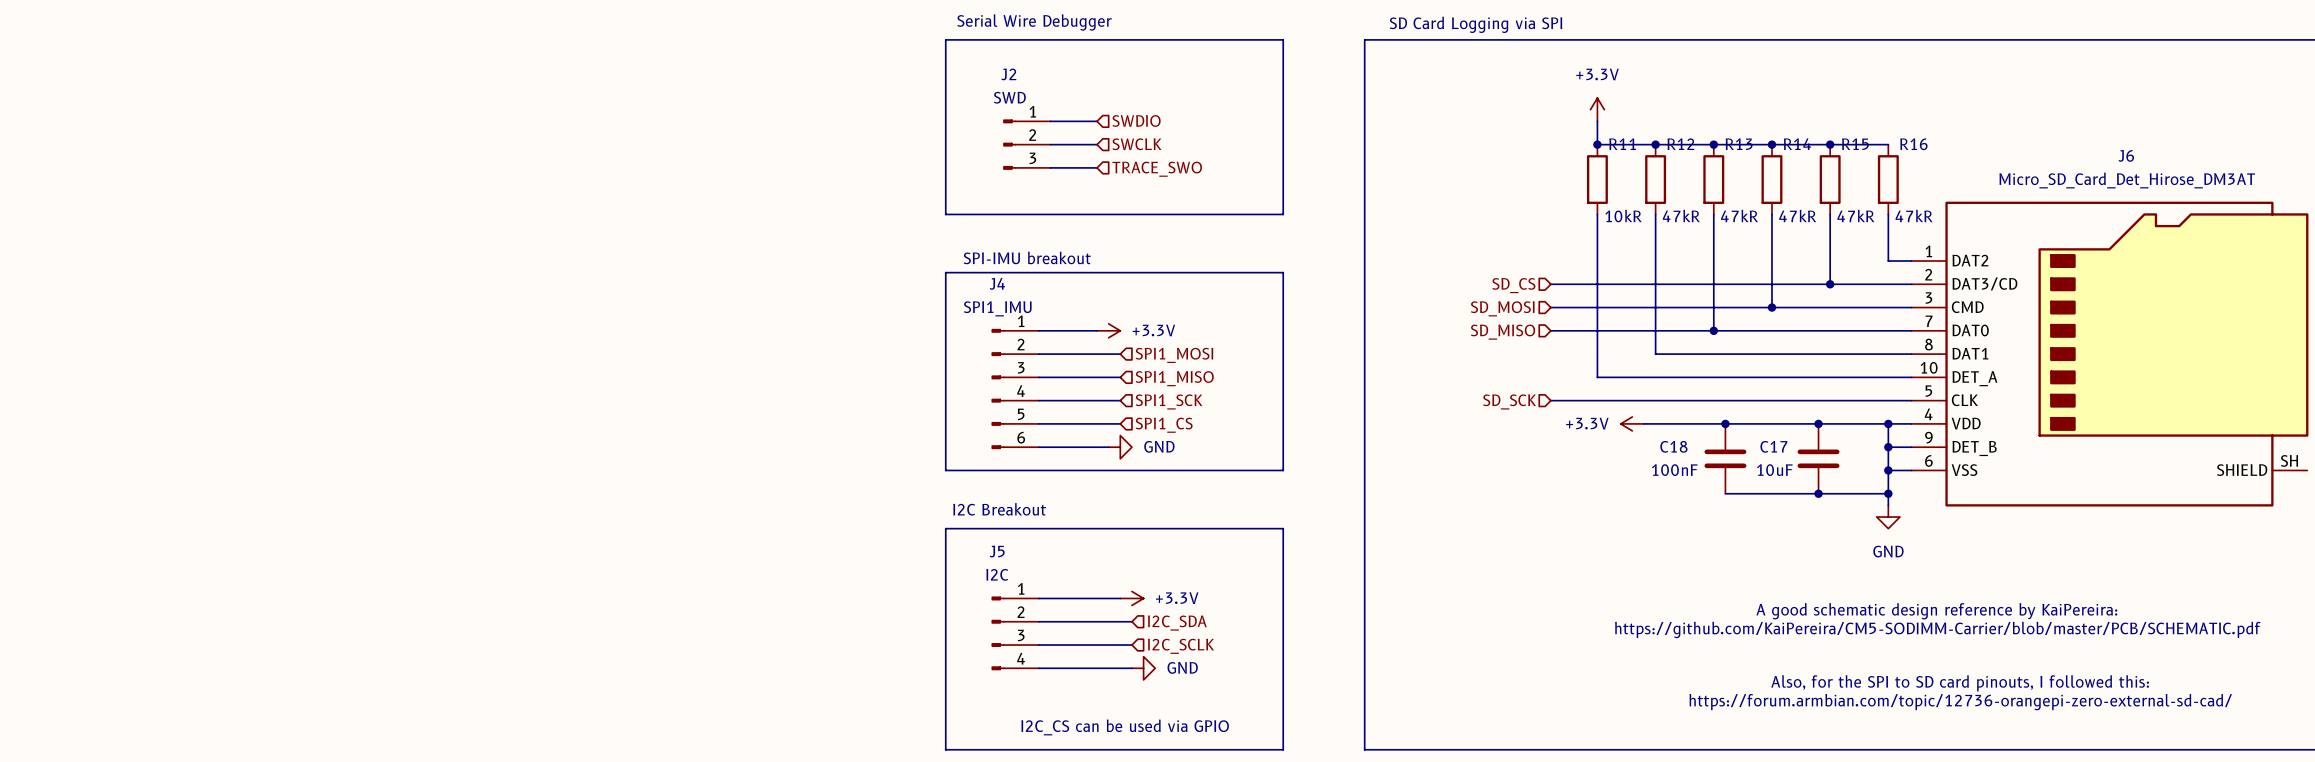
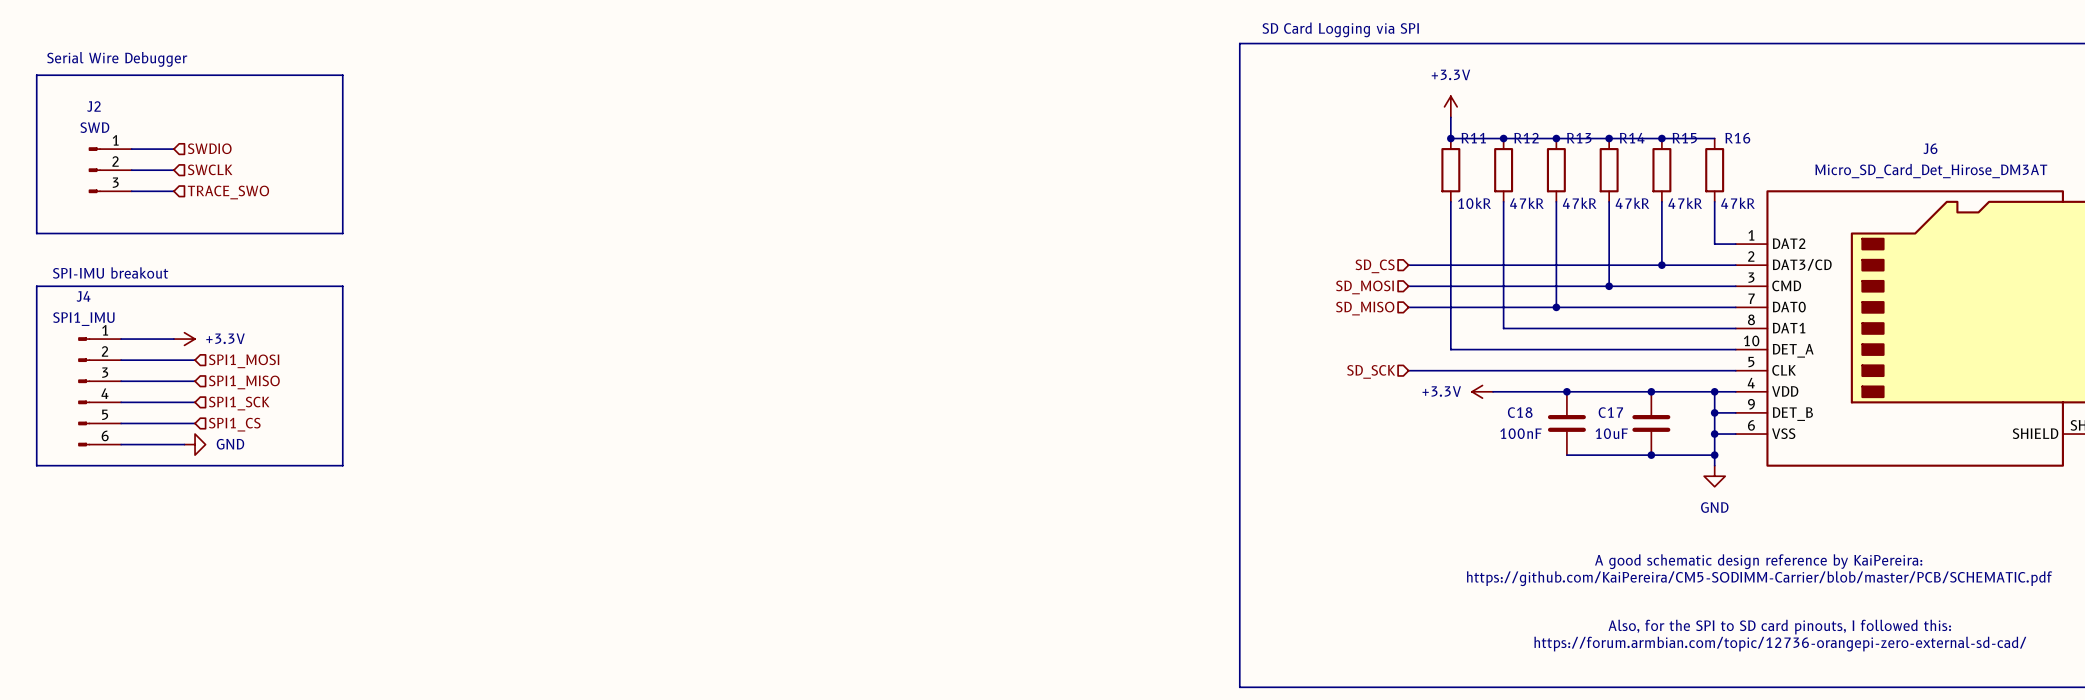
text: Serial Wire Debugger (1034, 22) -> none
line: (945, 39) (945, 214) (1283, 214) (1283, 39) (945, 39) -> none
text: none -> Serial Wire Debugger (117, 59)
line: none -> (36, 75) (36, 233) (342, 233) (342, 75) (36, 75)
hierarchical label: SWDIO (1136, 120) -> none
wire: (1050, 121) (1097, 121) -> none
J2 position: (1026, 144) -> (110, 170)
wire: (1050, 144) (1097, 144) -> none
hierarchical label: SWCLK (1136, 144) -> none
hierarchical label: none -> SWDIO (209, 148)
wire: none -> (131, 149) (173, 149)
wire: (1050, 167) (1097, 167) -> none
hierarchical label: TRACE_SWO (1157, 169) -> none
wire: none -> (131, 170) (173, 170)
hierarchical label: none -> SWCLK (210, 169)
wire: none -> (131, 191) (173, 191)
hierarchical label: none -> TRACE_SWO (228, 192)
text: SPI-IMU breakout (1027, 257) -> none
line: (945, 272) (1283, 272) (1283, 470) (945, 470) (945, 272) -> none
text: none -> SPI-IMU breakout (110, 272)
line: none -> (36, 286) (342, 286) (342, 465) (36, 465) (36, 286)
wire: (1038, 330) (1097, 330) -> none
power symbol: +3.3V (1108, 330) -> none
wire: (1038, 354) (1120, 354) -> none
hierarchical label: SPI1_MOSI (1174, 355) -> none
wire: none -> (121, 339) (173, 339)
power symbol: none -> +3.3V (184, 339)
wire: (1038, 377) (1120, 377) -> none
hierarchical label: SPI1_MISO (1174, 378) -> none
wire: none -> (121, 360) (195, 360)
J4 position: (1015, 389) -> (99, 391)
hierarchical label: none -> SPI1_MOSI (244, 361)
wire: (1038, 400) (1120, 400) -> none
hierarchical label: SPI1_SCK (1169, 401) -> none
wire: none -> (121, 381) (195, 381)
hierarchical label: none -> SPI1_MISO (244, 382)
wire: (1038, 423) (1120, 423) -> none
hierarchical label: SPI1_CS (1164, 425) -> none
wire: none -> (121, 402) (195, 402)
hierarchical label: none -> SPI1_SCK (239, 403)
wire: (1038, 447) (1108, 447) -> none
power symbol: GND (1120, 447) -> none
wire: none -> (121, 423) (195, 423)
hierarchical label: none -> SPI1_CS (234, 424)
wire: none -> (121, 444) (184, 444)
power symbol: none -> GND (195, 444)
text: I2C Breakout (999, 509) -> none
line: (945, 528) (945, 749) (1283, 749) (1283, 528) (945, 528) -> none
wire: (1038, 598) (1120, 598) -> none
power symbol: +3.3V (1131, 598) -> none
wire: (1038, 621) (1131, 621) -> none
hierarchical label: I2C_SDA (1177, 623) -> none
J5: I2C (1015, 633) -> none
wire: (1038, 645) (1131, 645) -> none
hierarchical label: I2C_SCLK (1180, 646) -> none
wire: (1038, 668) (1131, 668) -> none
power symbol: GND (1143, 668) -> none
text: I2C_CS can be used via GPIO (1125, 727) -> none

